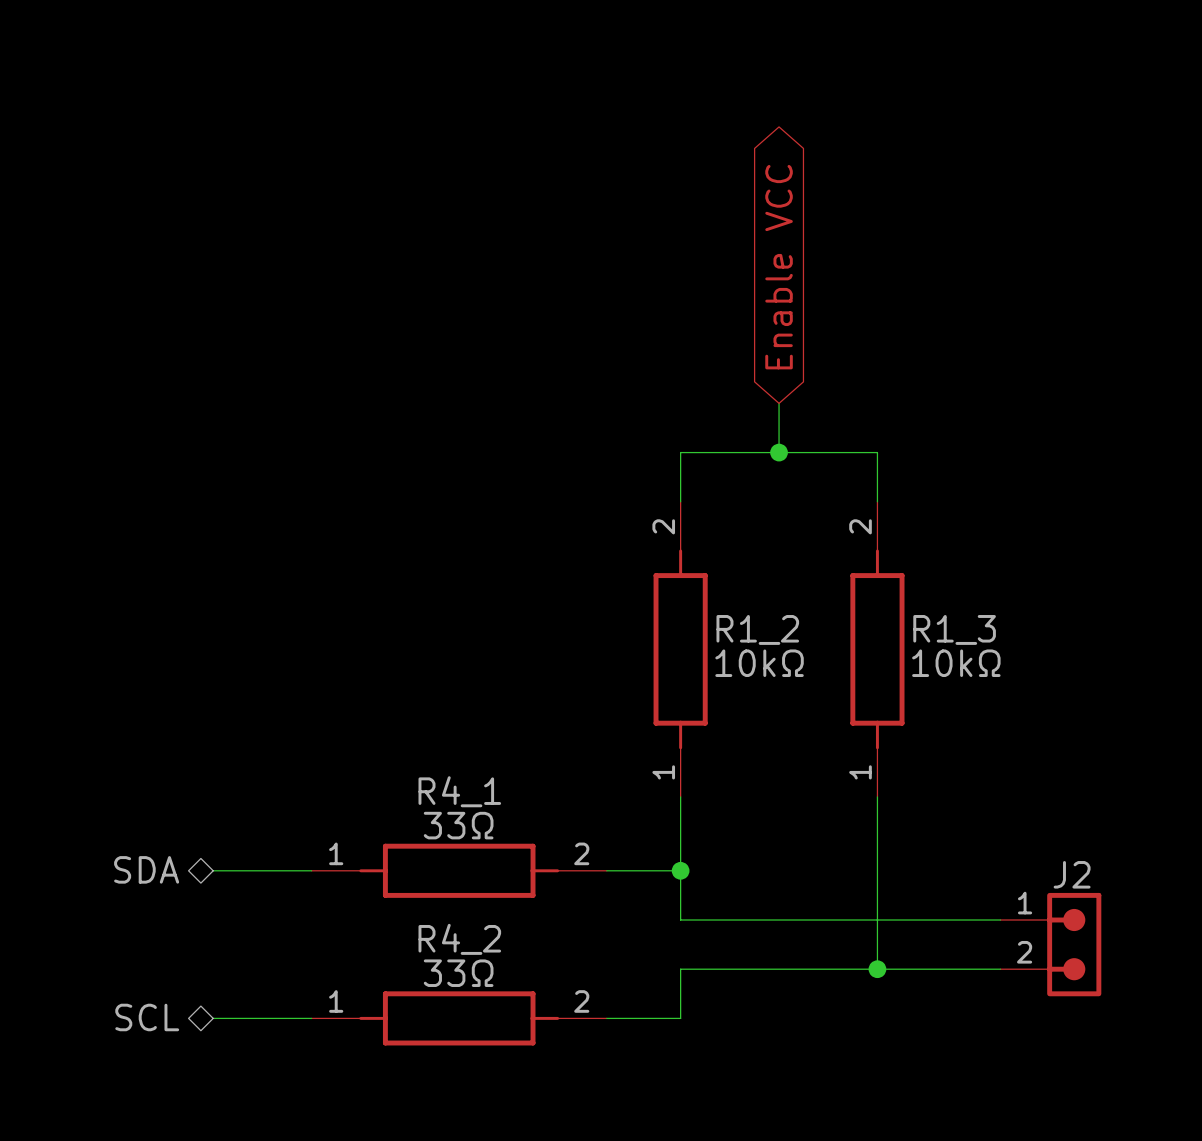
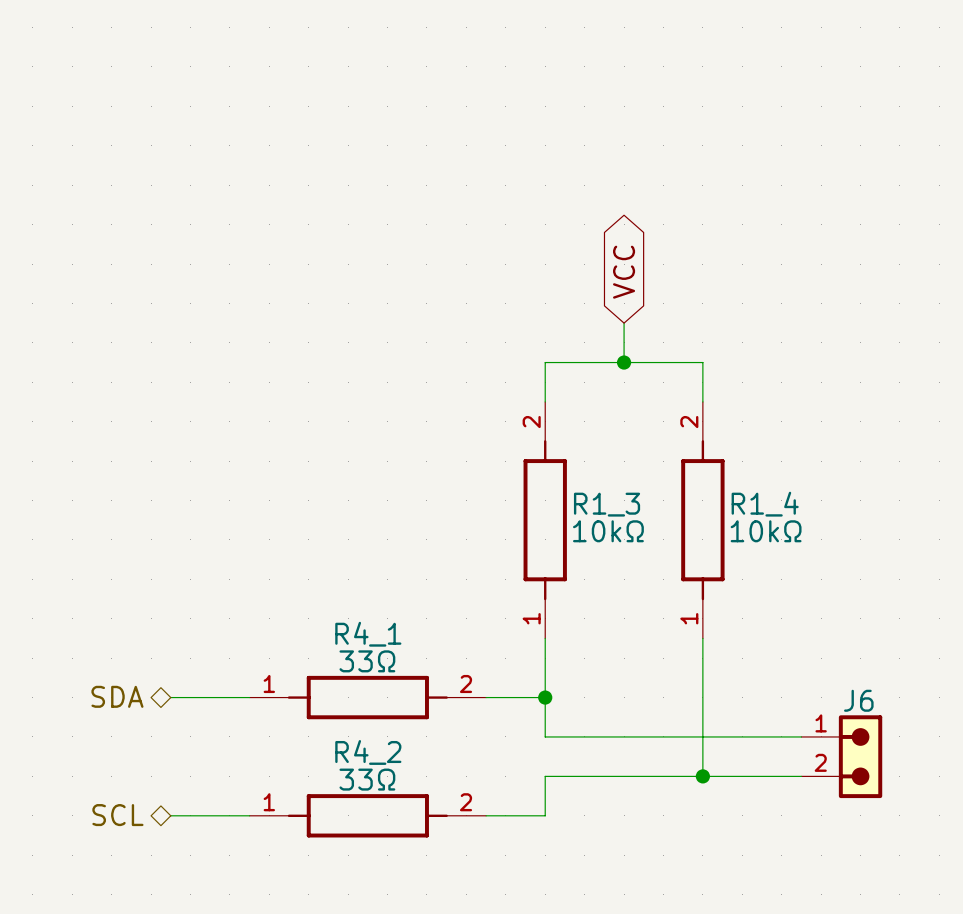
global label: Enable VCC (779, 267) -> VCC (624, 272)
R1_2 name: R1_2 (757, 629) -> R1_3 (607, 504)
R1_3 name: R1_3 (954, 629) -> R1_4 (765, 504)
J2 name: J2 (1072, 874) -> J6 (858, 700)

